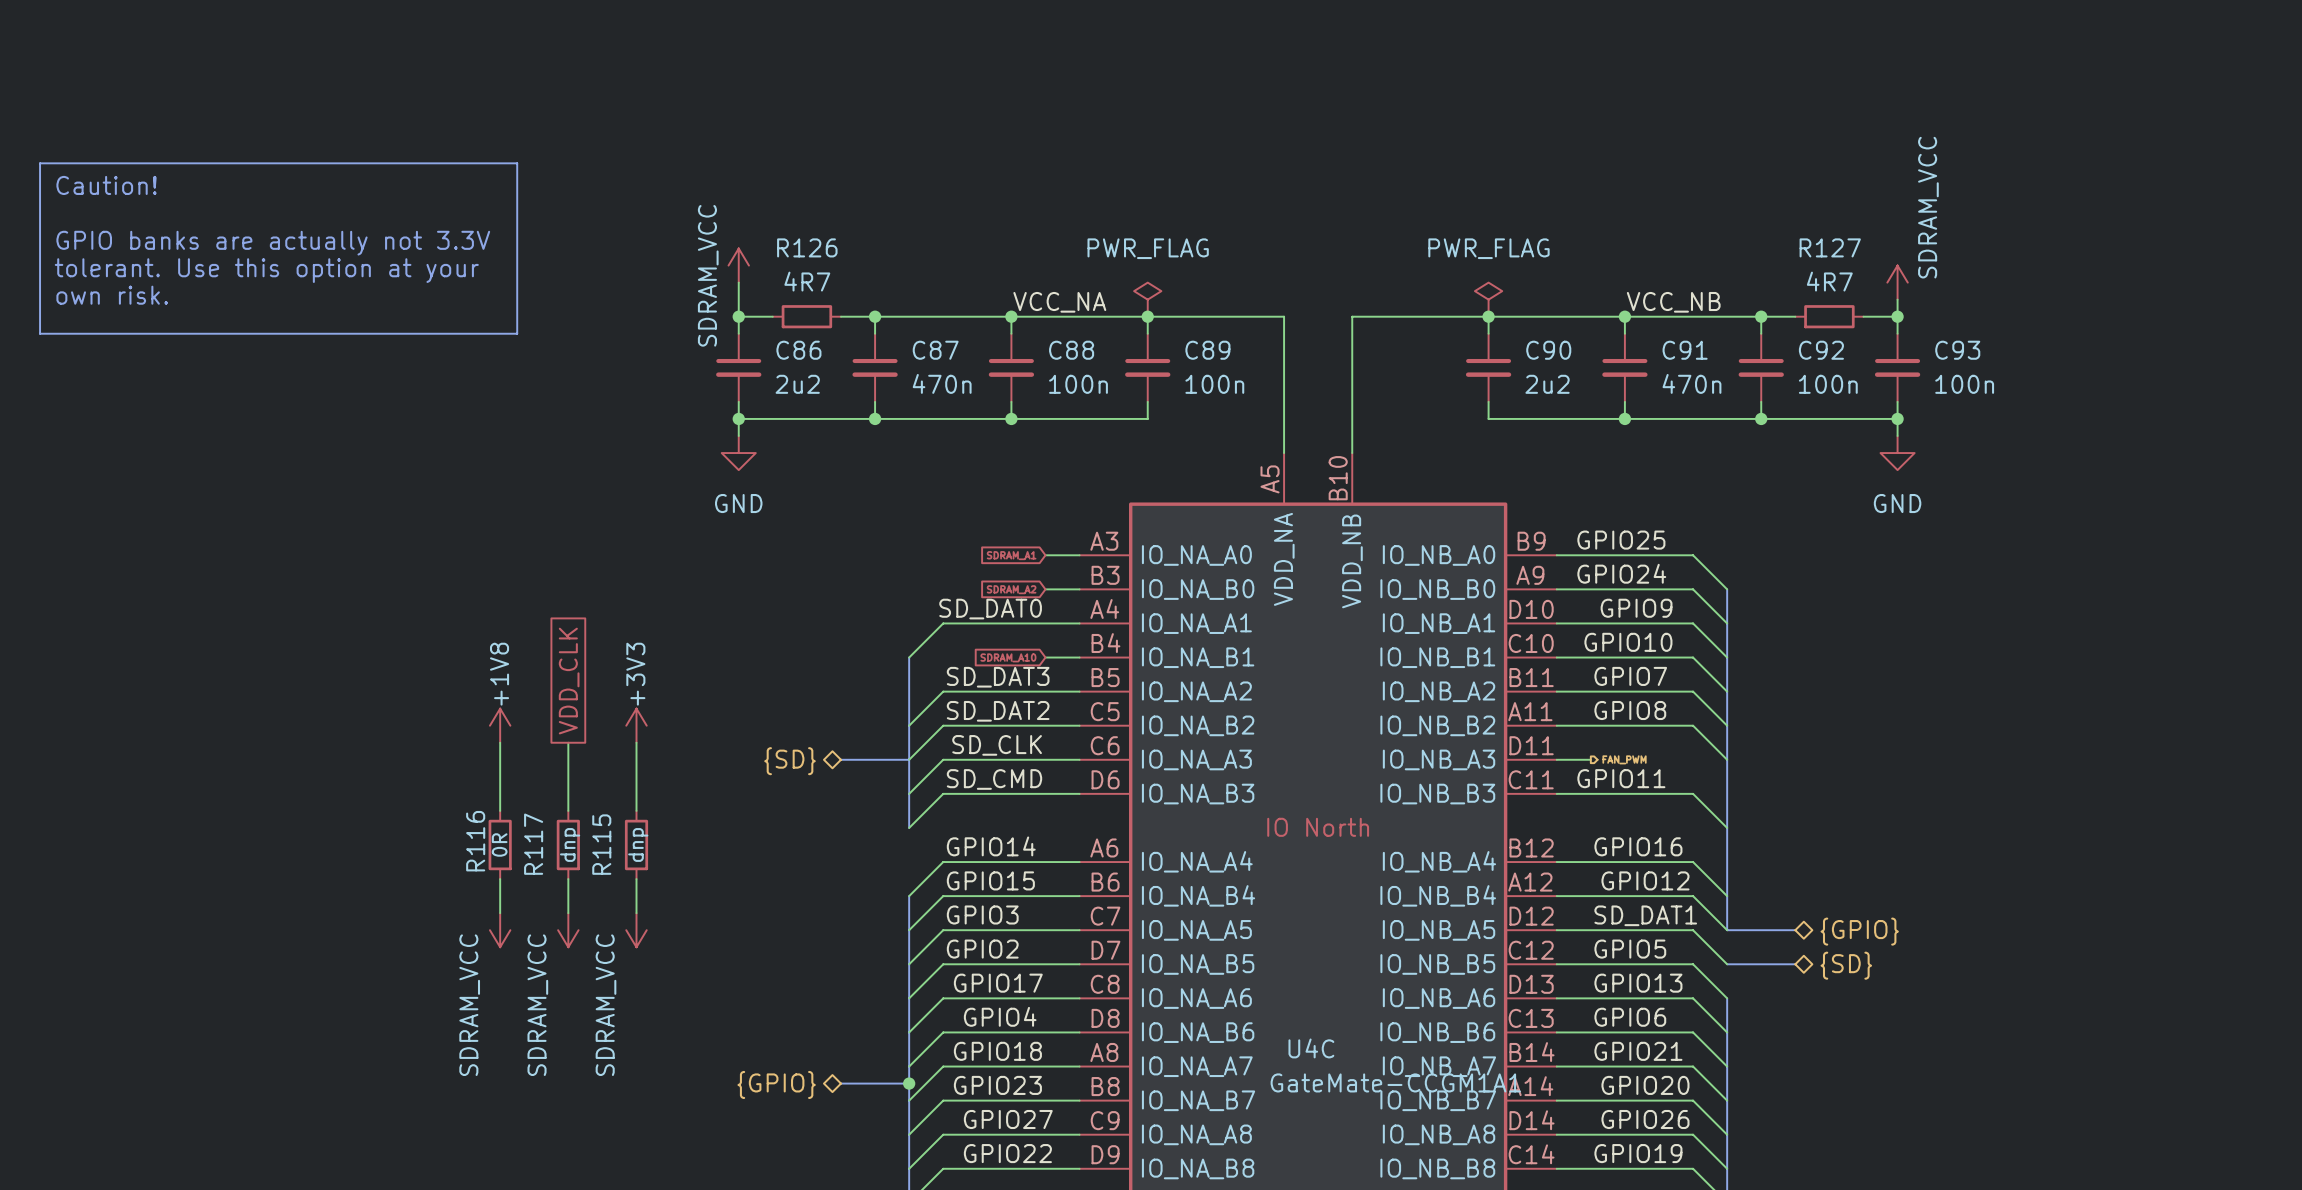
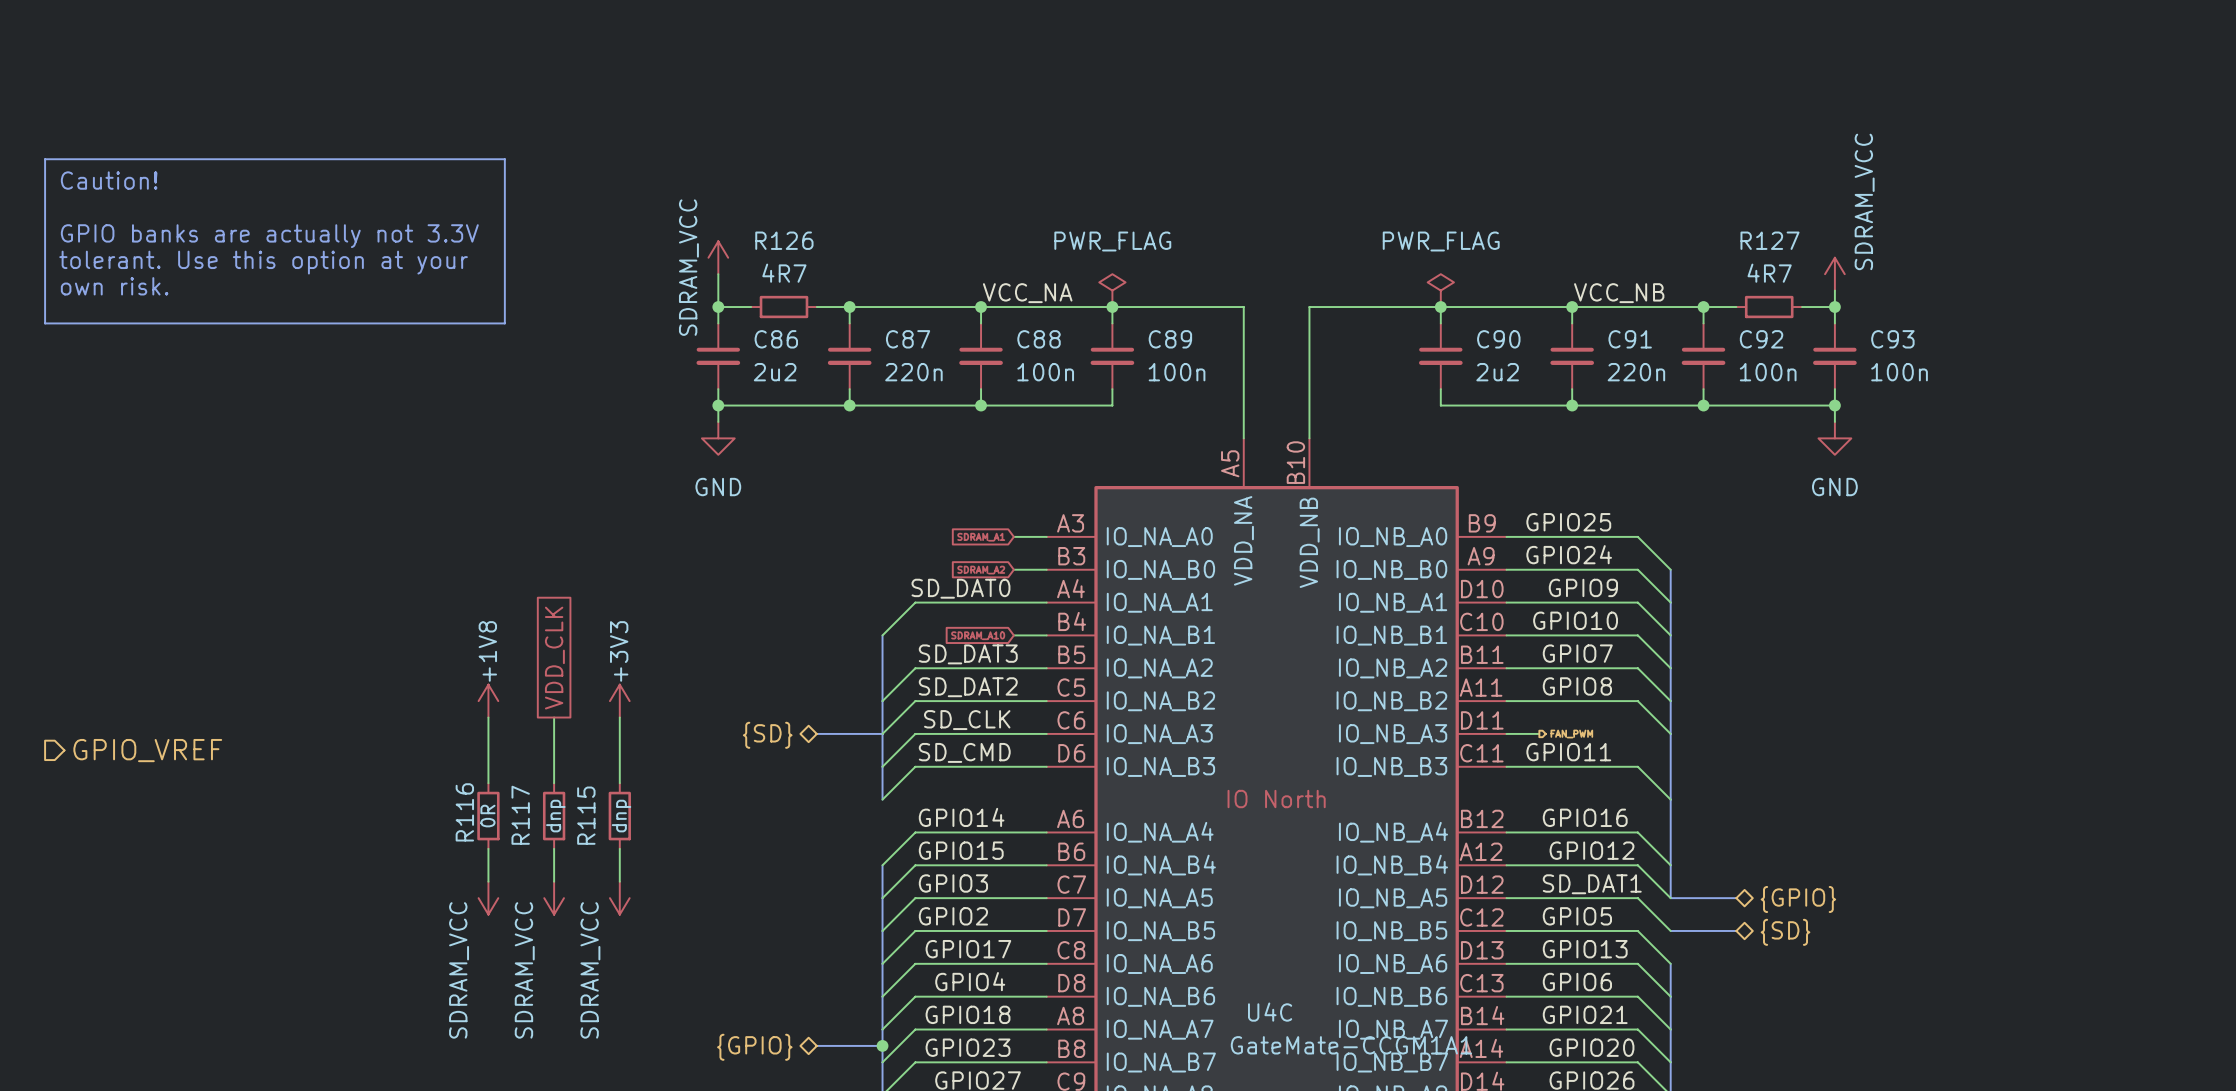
C87 value: 470n (942, 383) -> 220n (913, 372)
C91 value: 470n (1691, 383) -> 220n (1636, 372)
hierarchical label: none -> GPIO_VREF (147, 750)

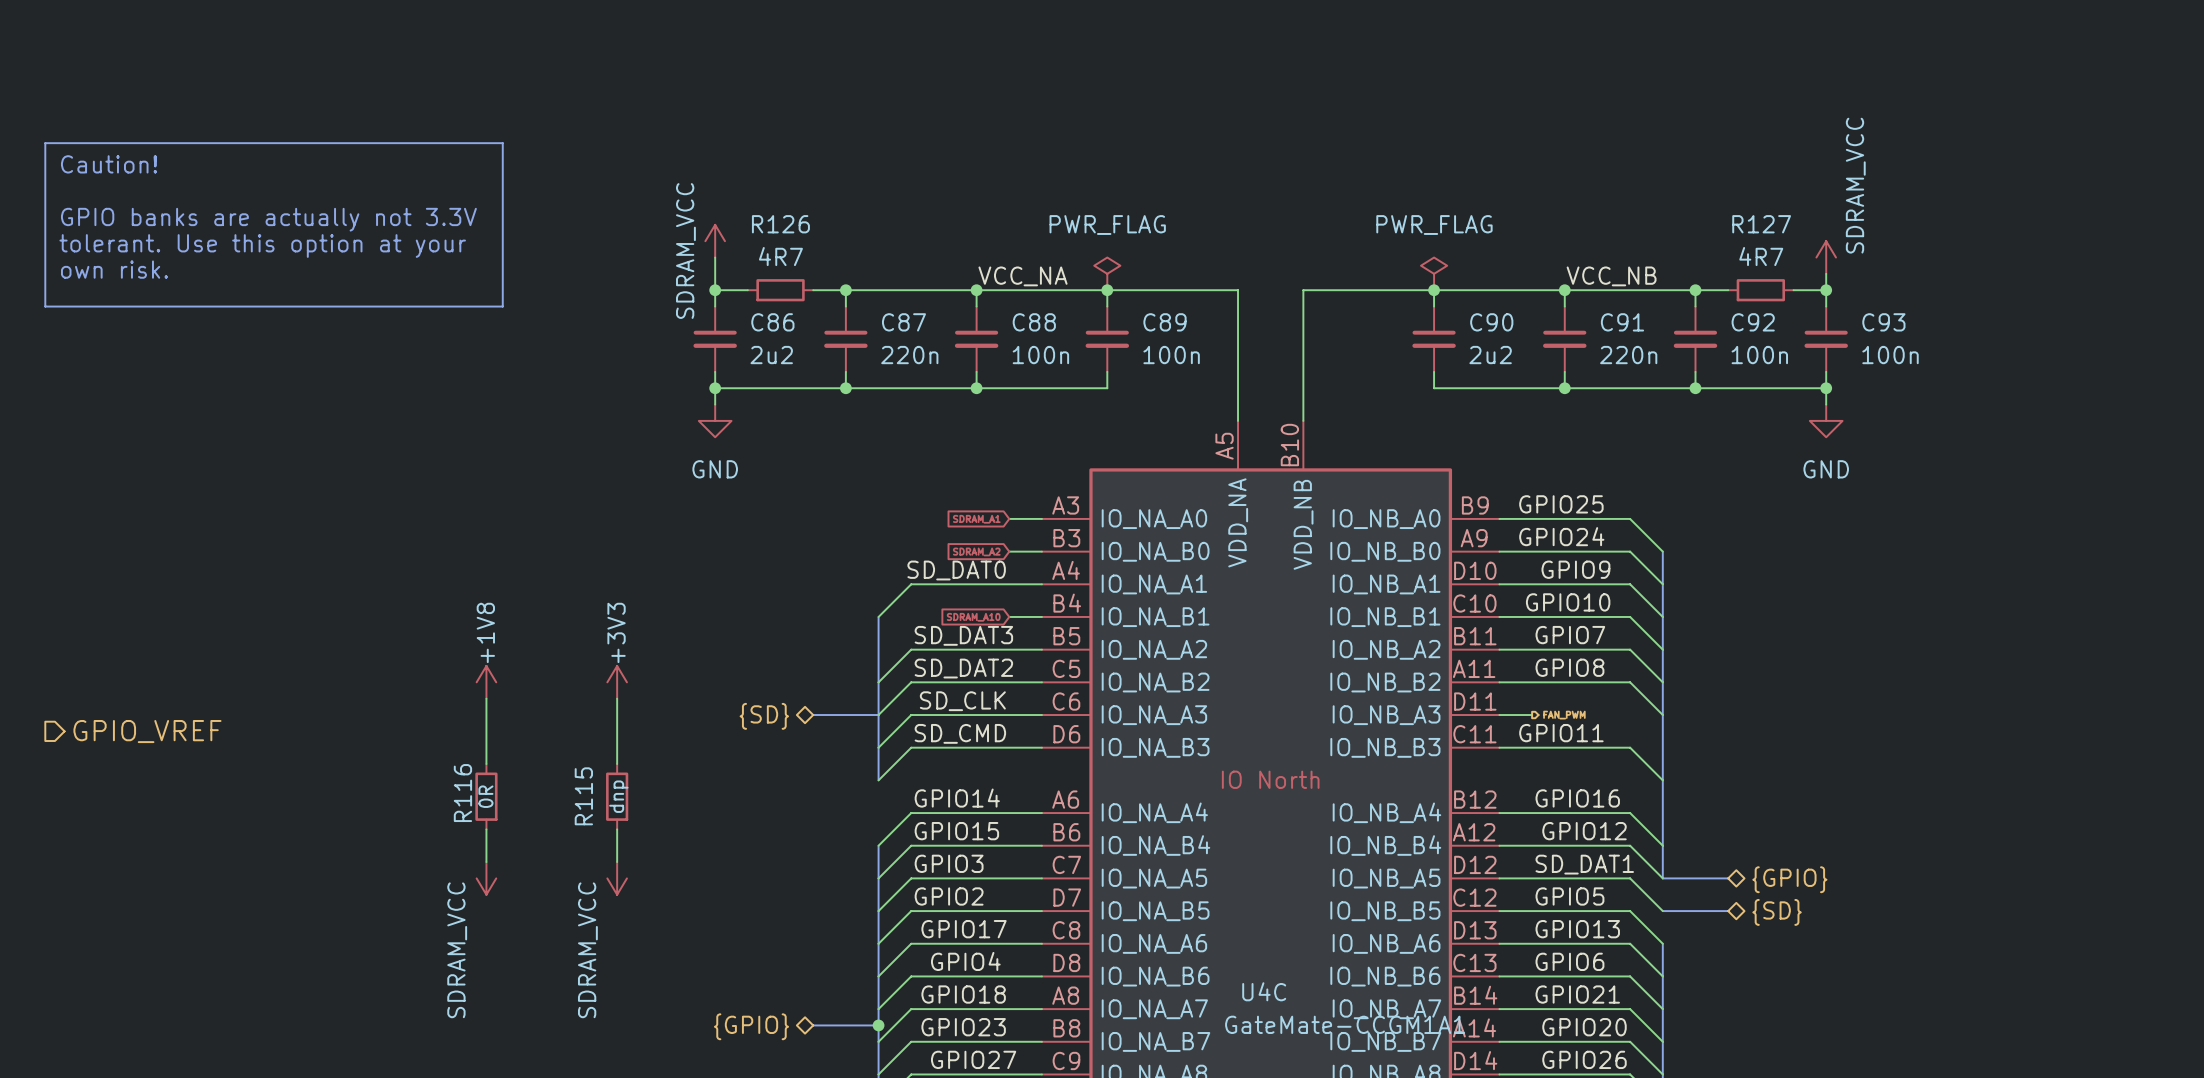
global label: VDD_CLK (554, 658) -> none
wire: (554, 717) (554, 783) -> none
R117: dnp (554, 816) -> none
wire: (554, 848) (554, 881) -> none
power symbol: SDRAM_VCC (554, 898) -> none

